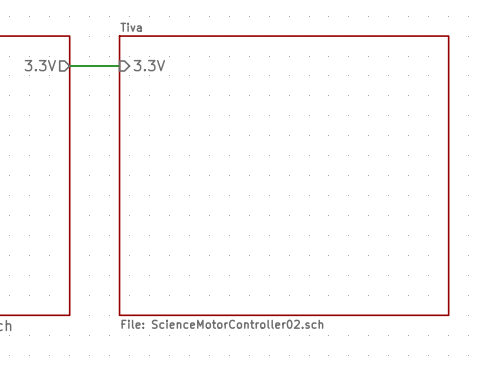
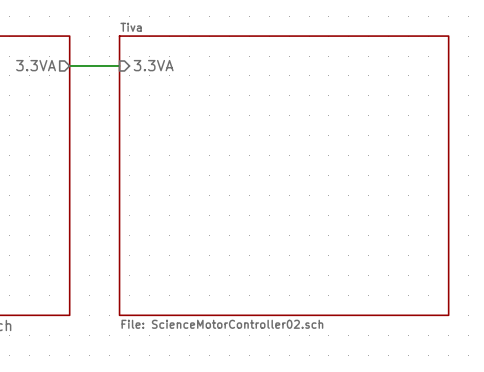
sheet pin: 3.3V (40, 65) -> 3.3VA (36, 65)
sheet pin: 3.3V (149, 65) -> 3.3VA (153, 65)

